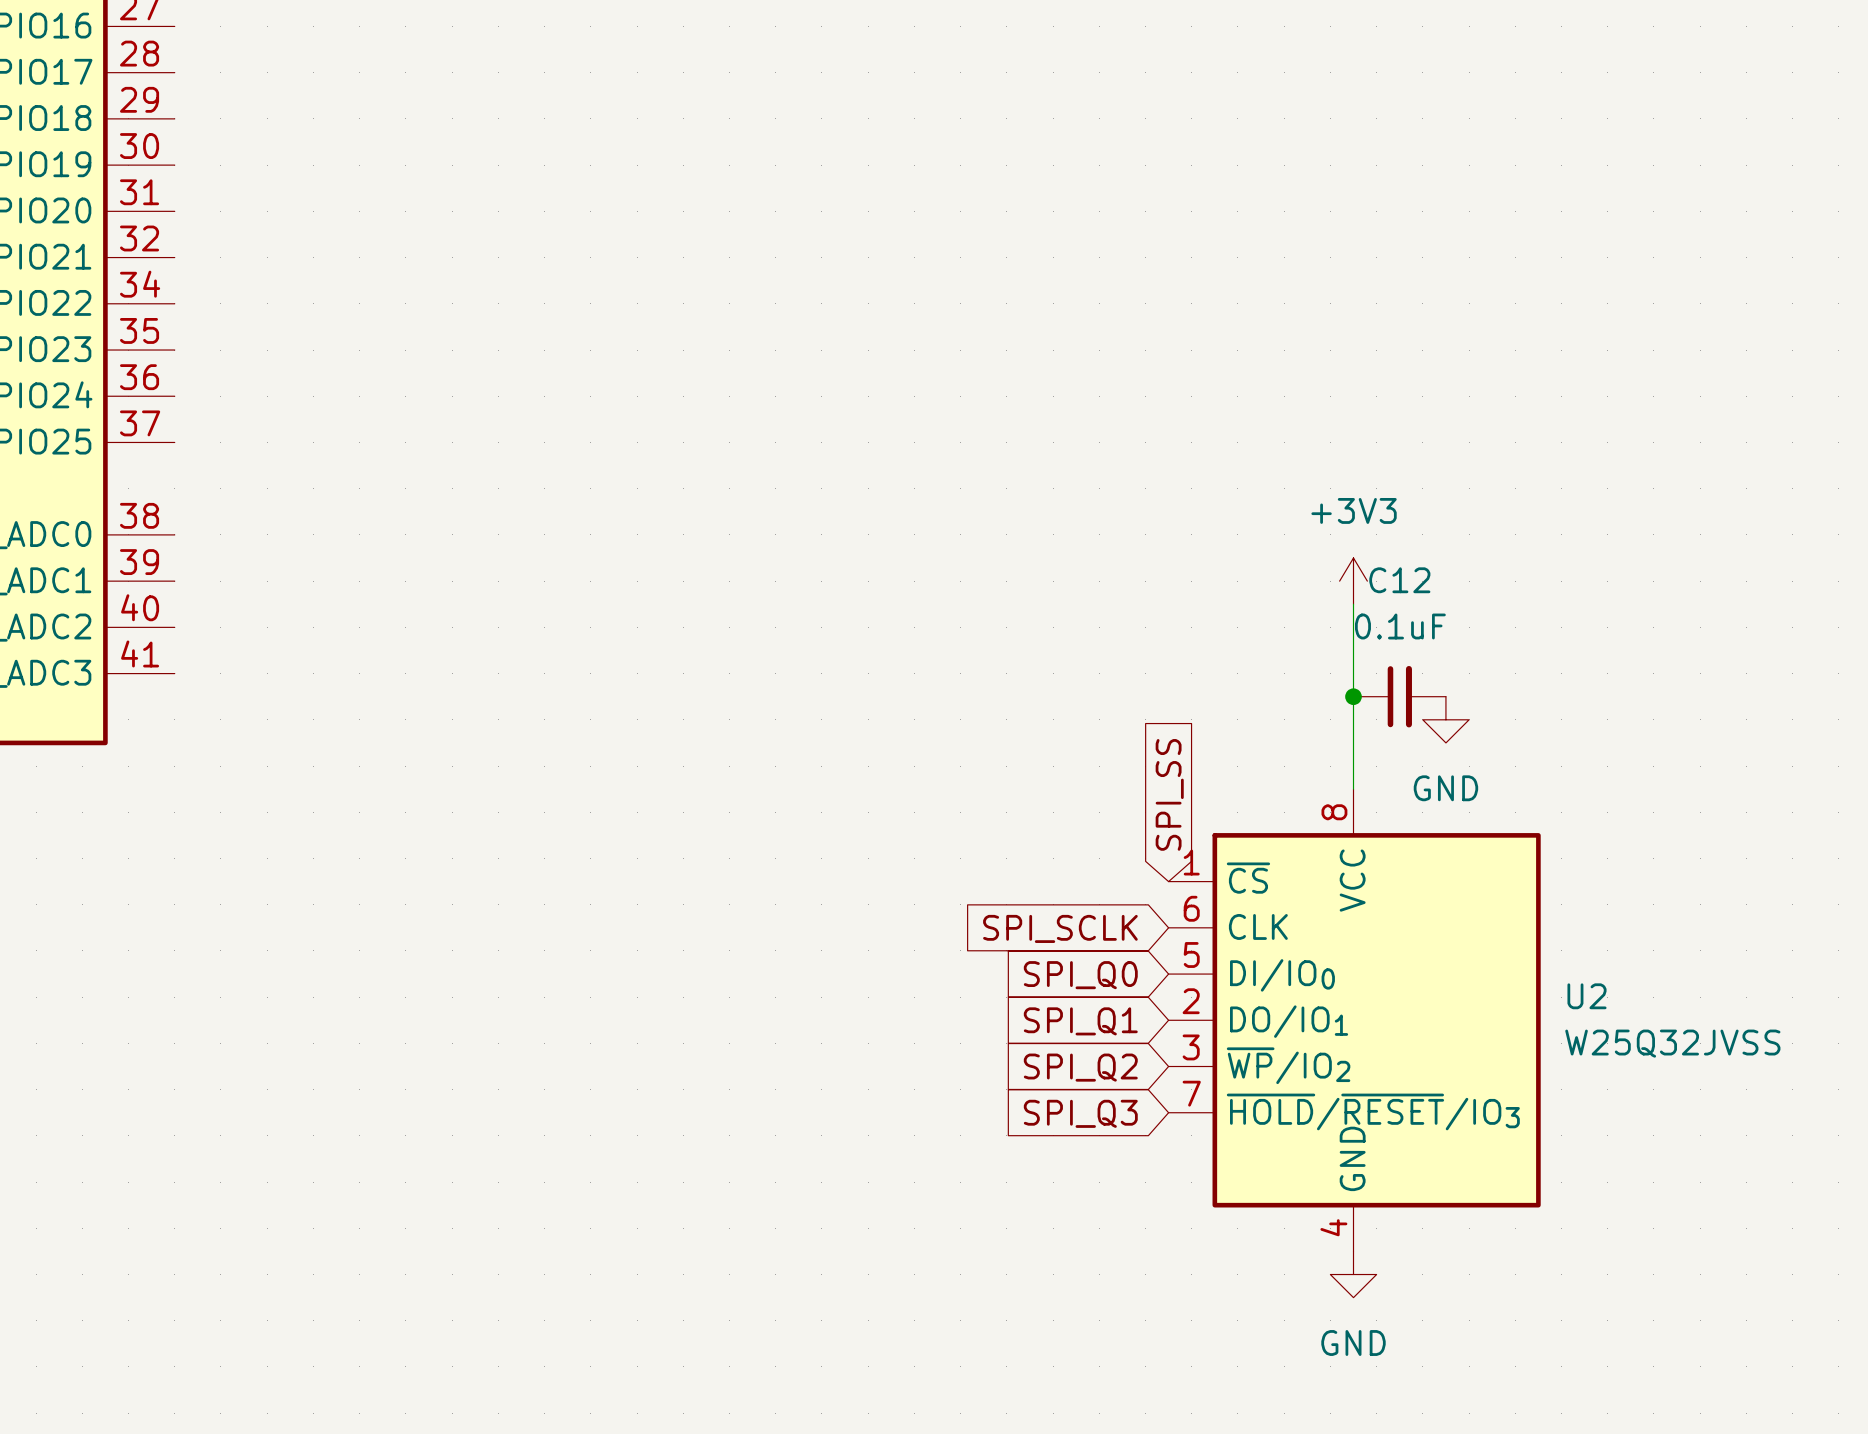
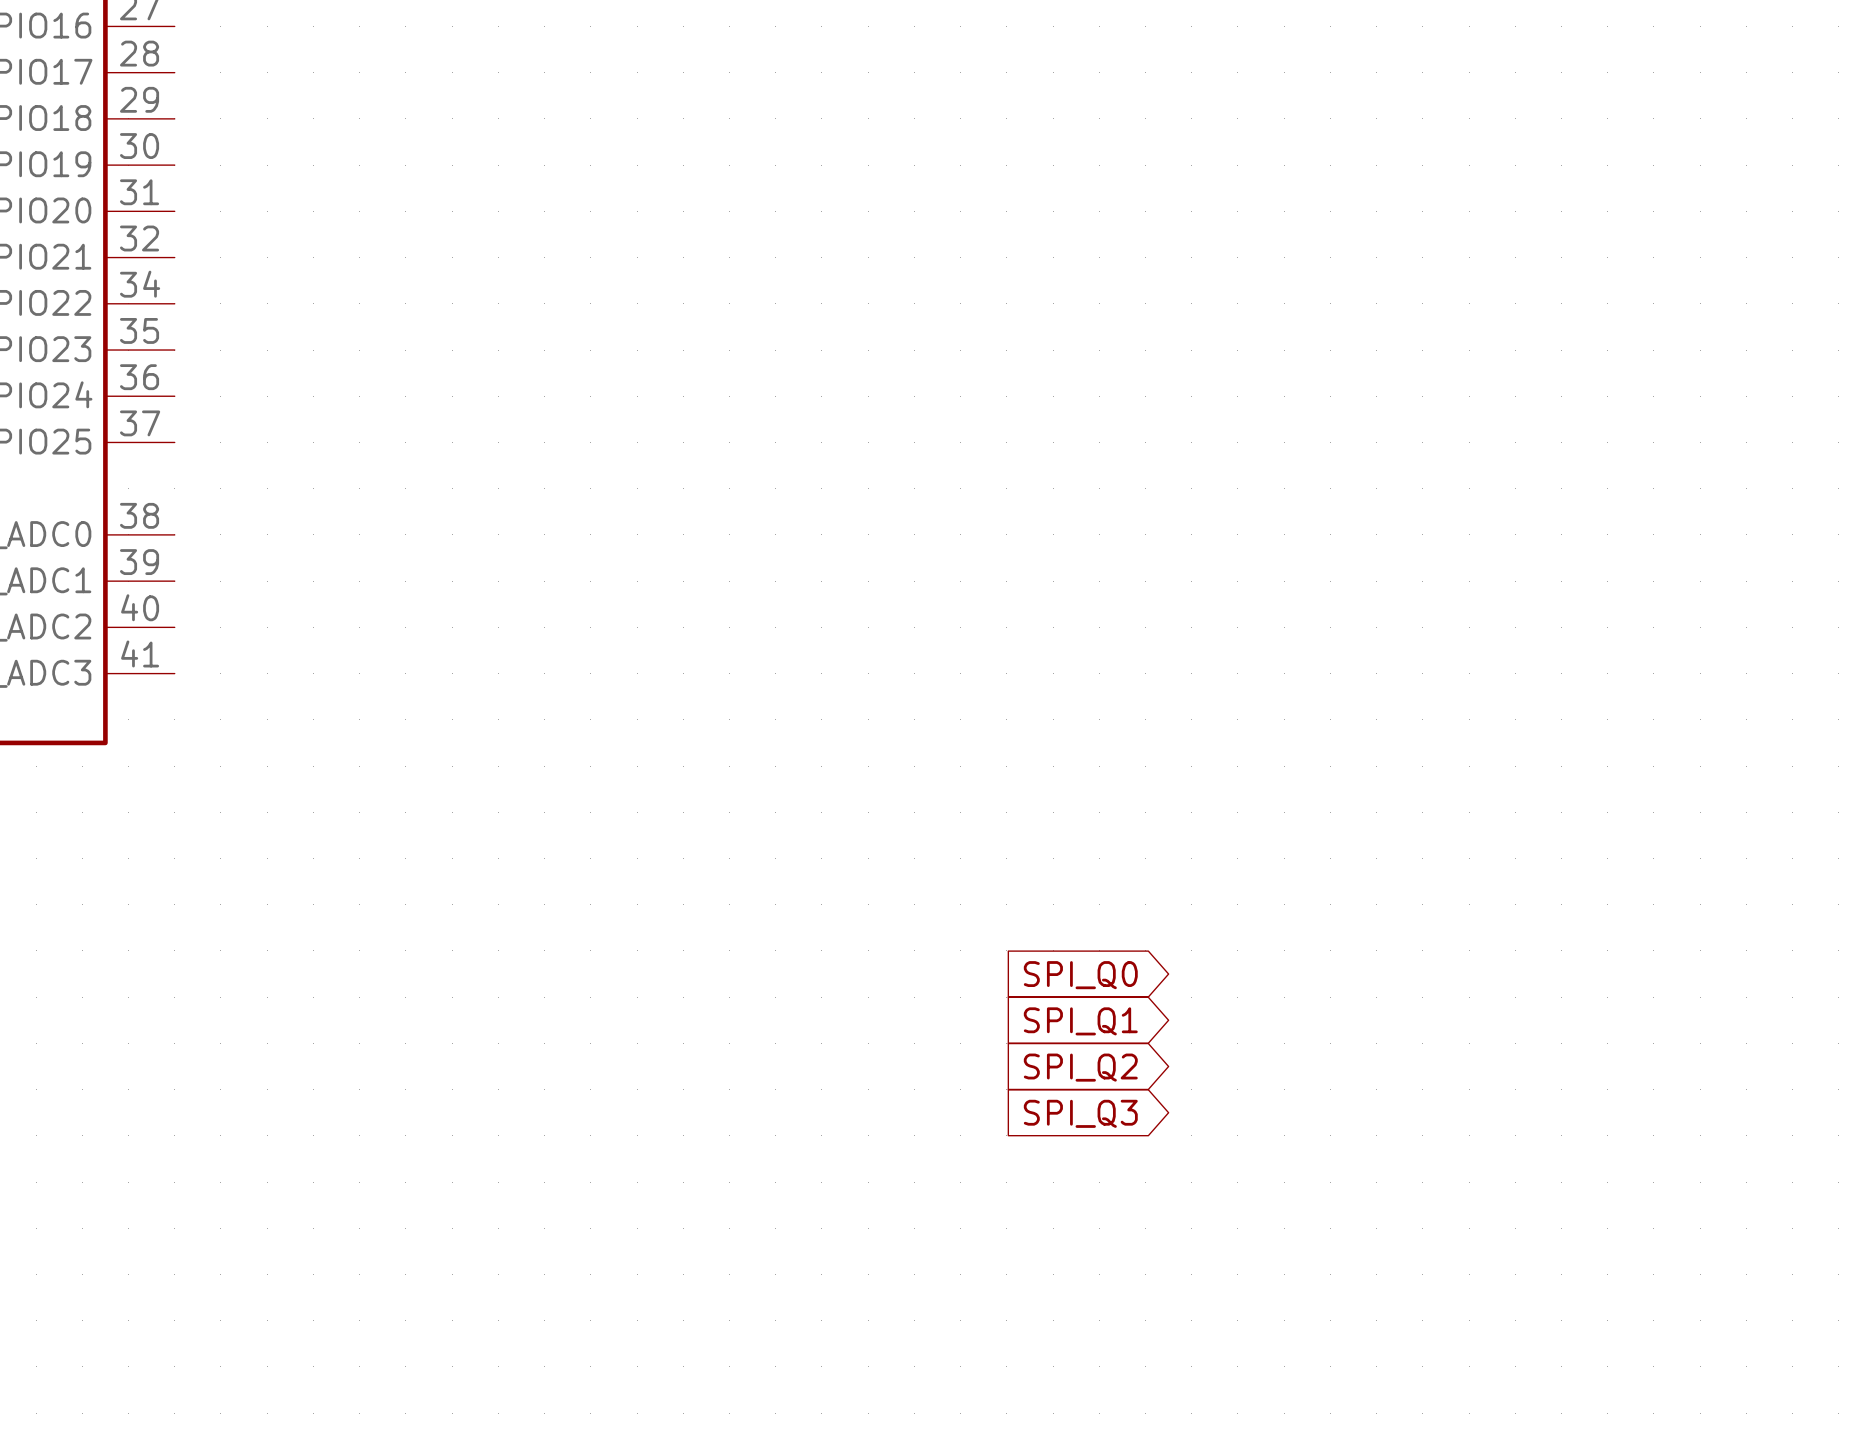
power symbol: +3V3 (1353, 581) -> none
wire: (1353, 604) (1353, 789) -> none
junction: (1353, 696) -> none
C12: 0.1uF (1399, 696) -> none
power symbol: GND (1445, 719) -> none
global label: SPI_SS (1169, 794) -> none
global label: SPI_SCLK (1060, 928) -> none
U2: W25Q32JVSS (1354, 1020) -> none
power symbol: GND (1353, 1274) -> none

